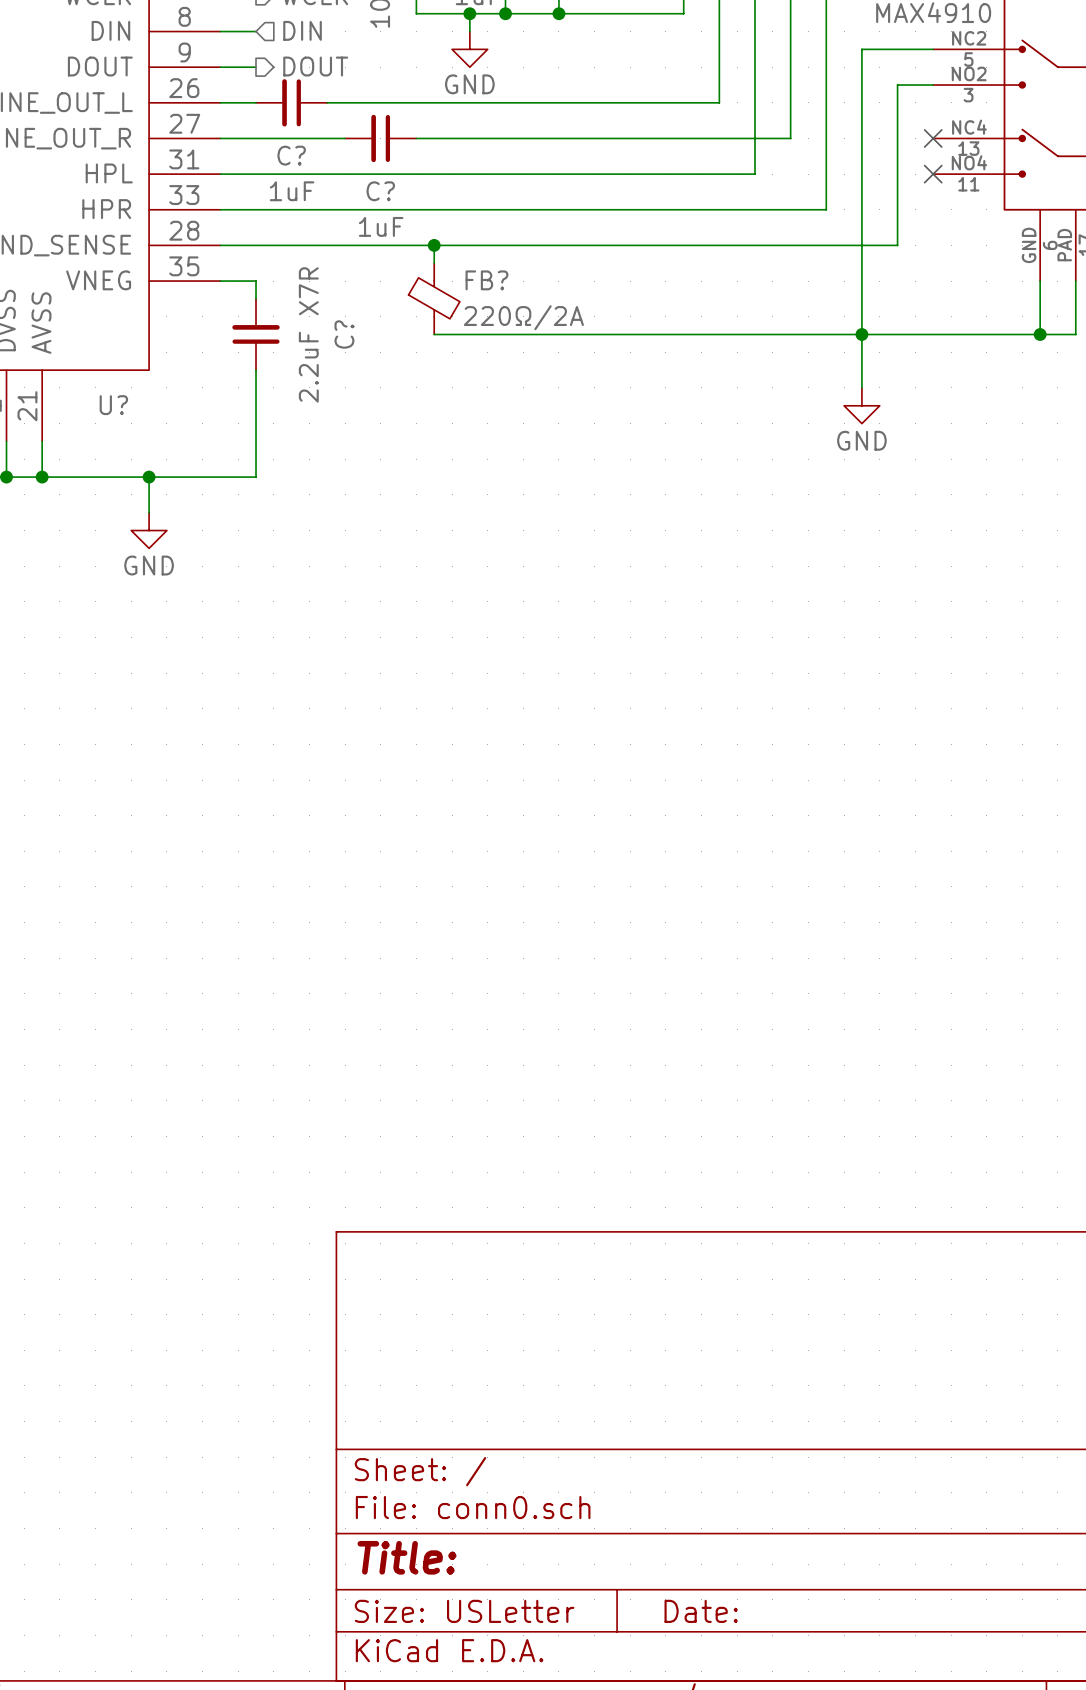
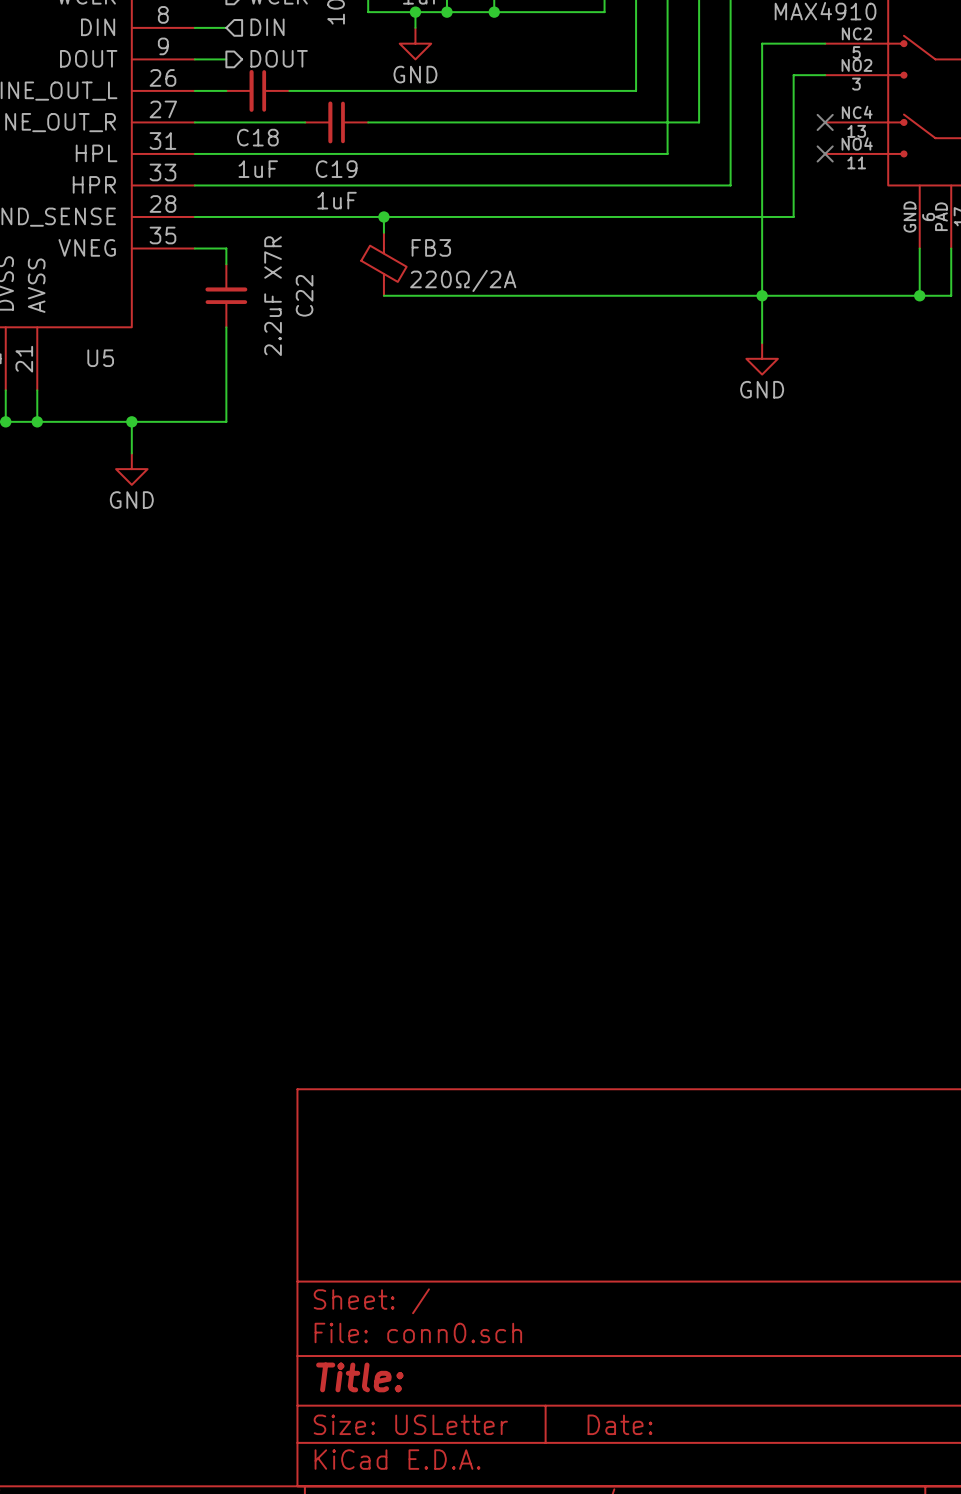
C? name: C? (291, 155) -> C18 (257, 137)
C? name: C? (380, 191) -> C19 (336, 169)
FB? name: FB? (486, 280) -> FB3 (431, 247)
C? name: C? (344, 334) -> C22 (304, 295)
U? name: U? (113, 405) -> U5 (100, 358)

